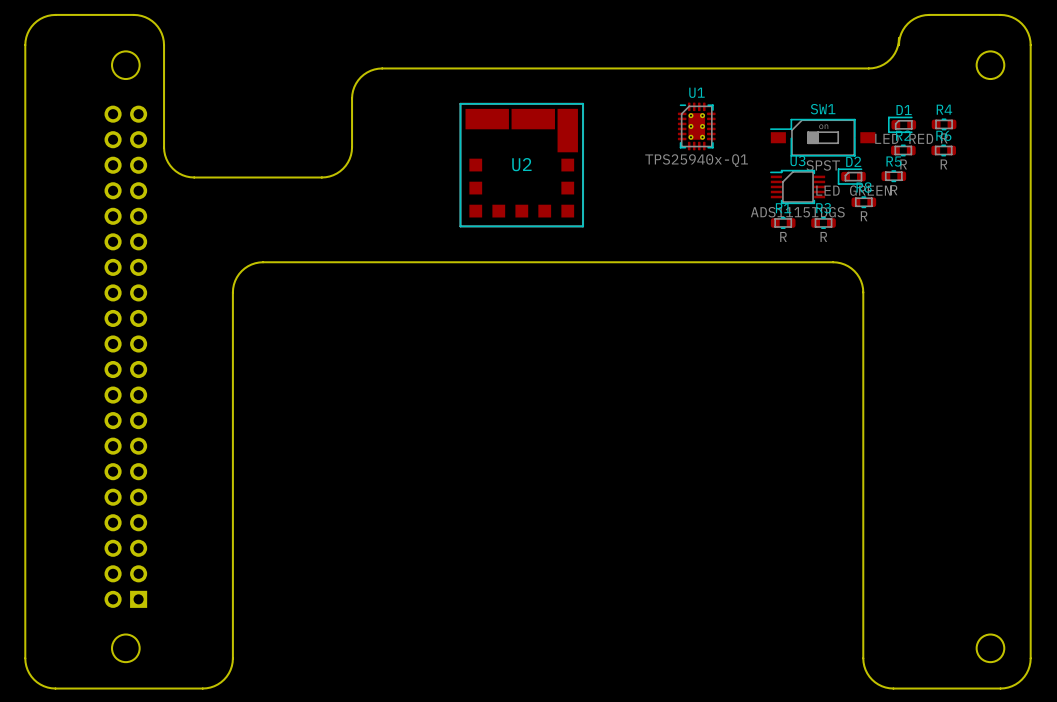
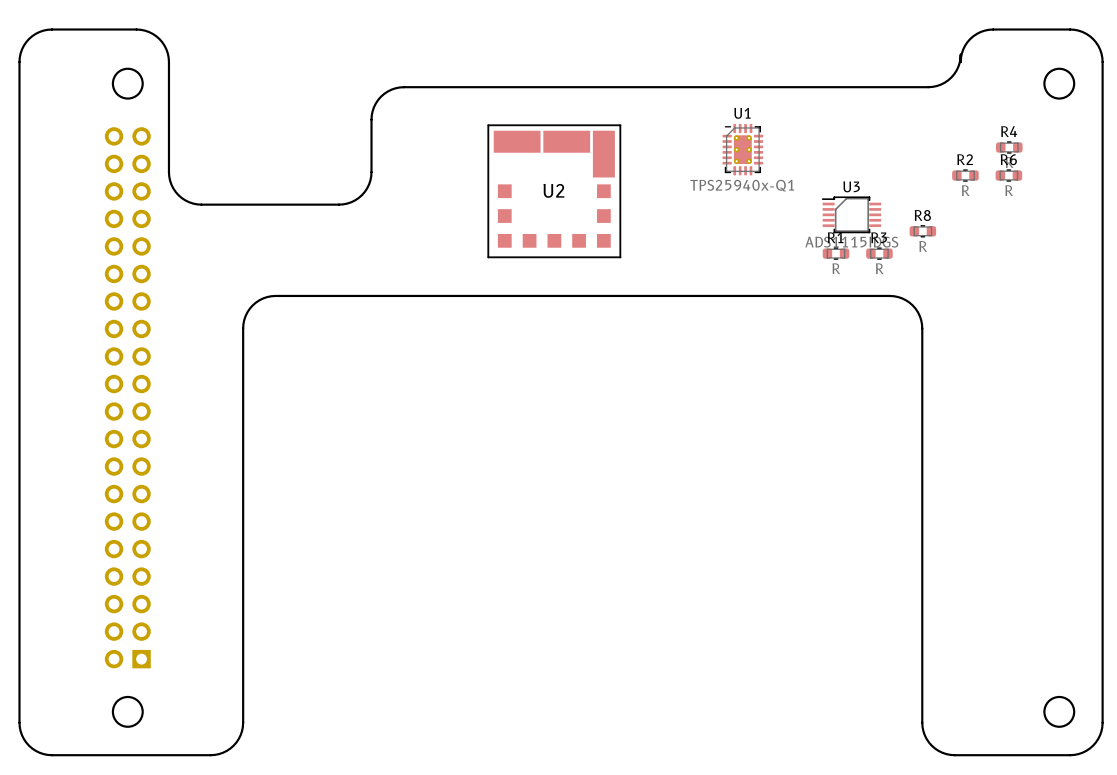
D1: LED RED (902, 124) -> none
SW1: SPST (822, 137) -> none
D2: LED GREEN (851, 176) -> none
R5: R (893, 176) -> none

